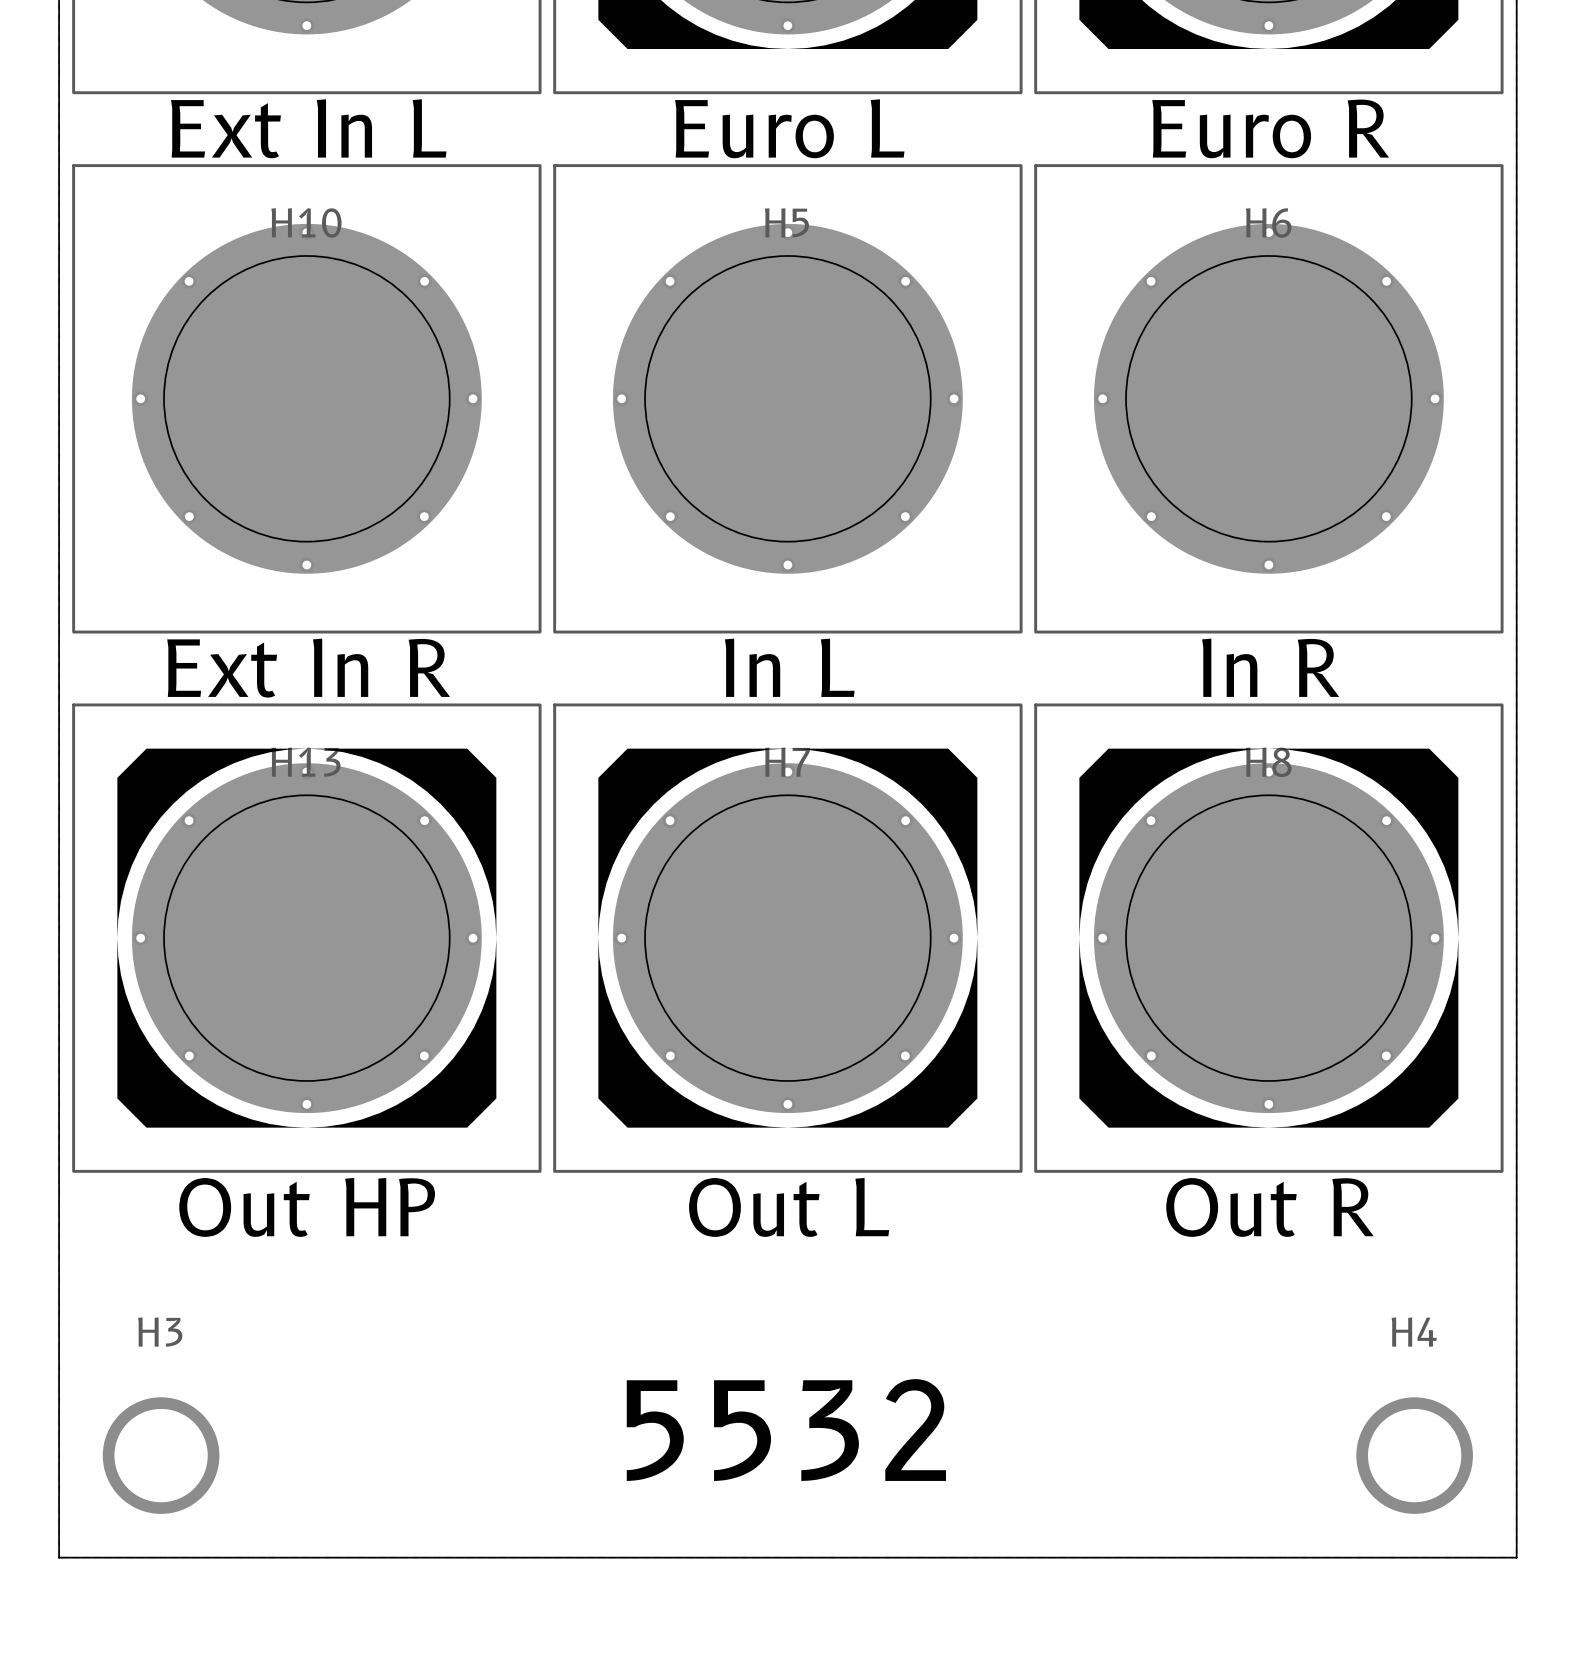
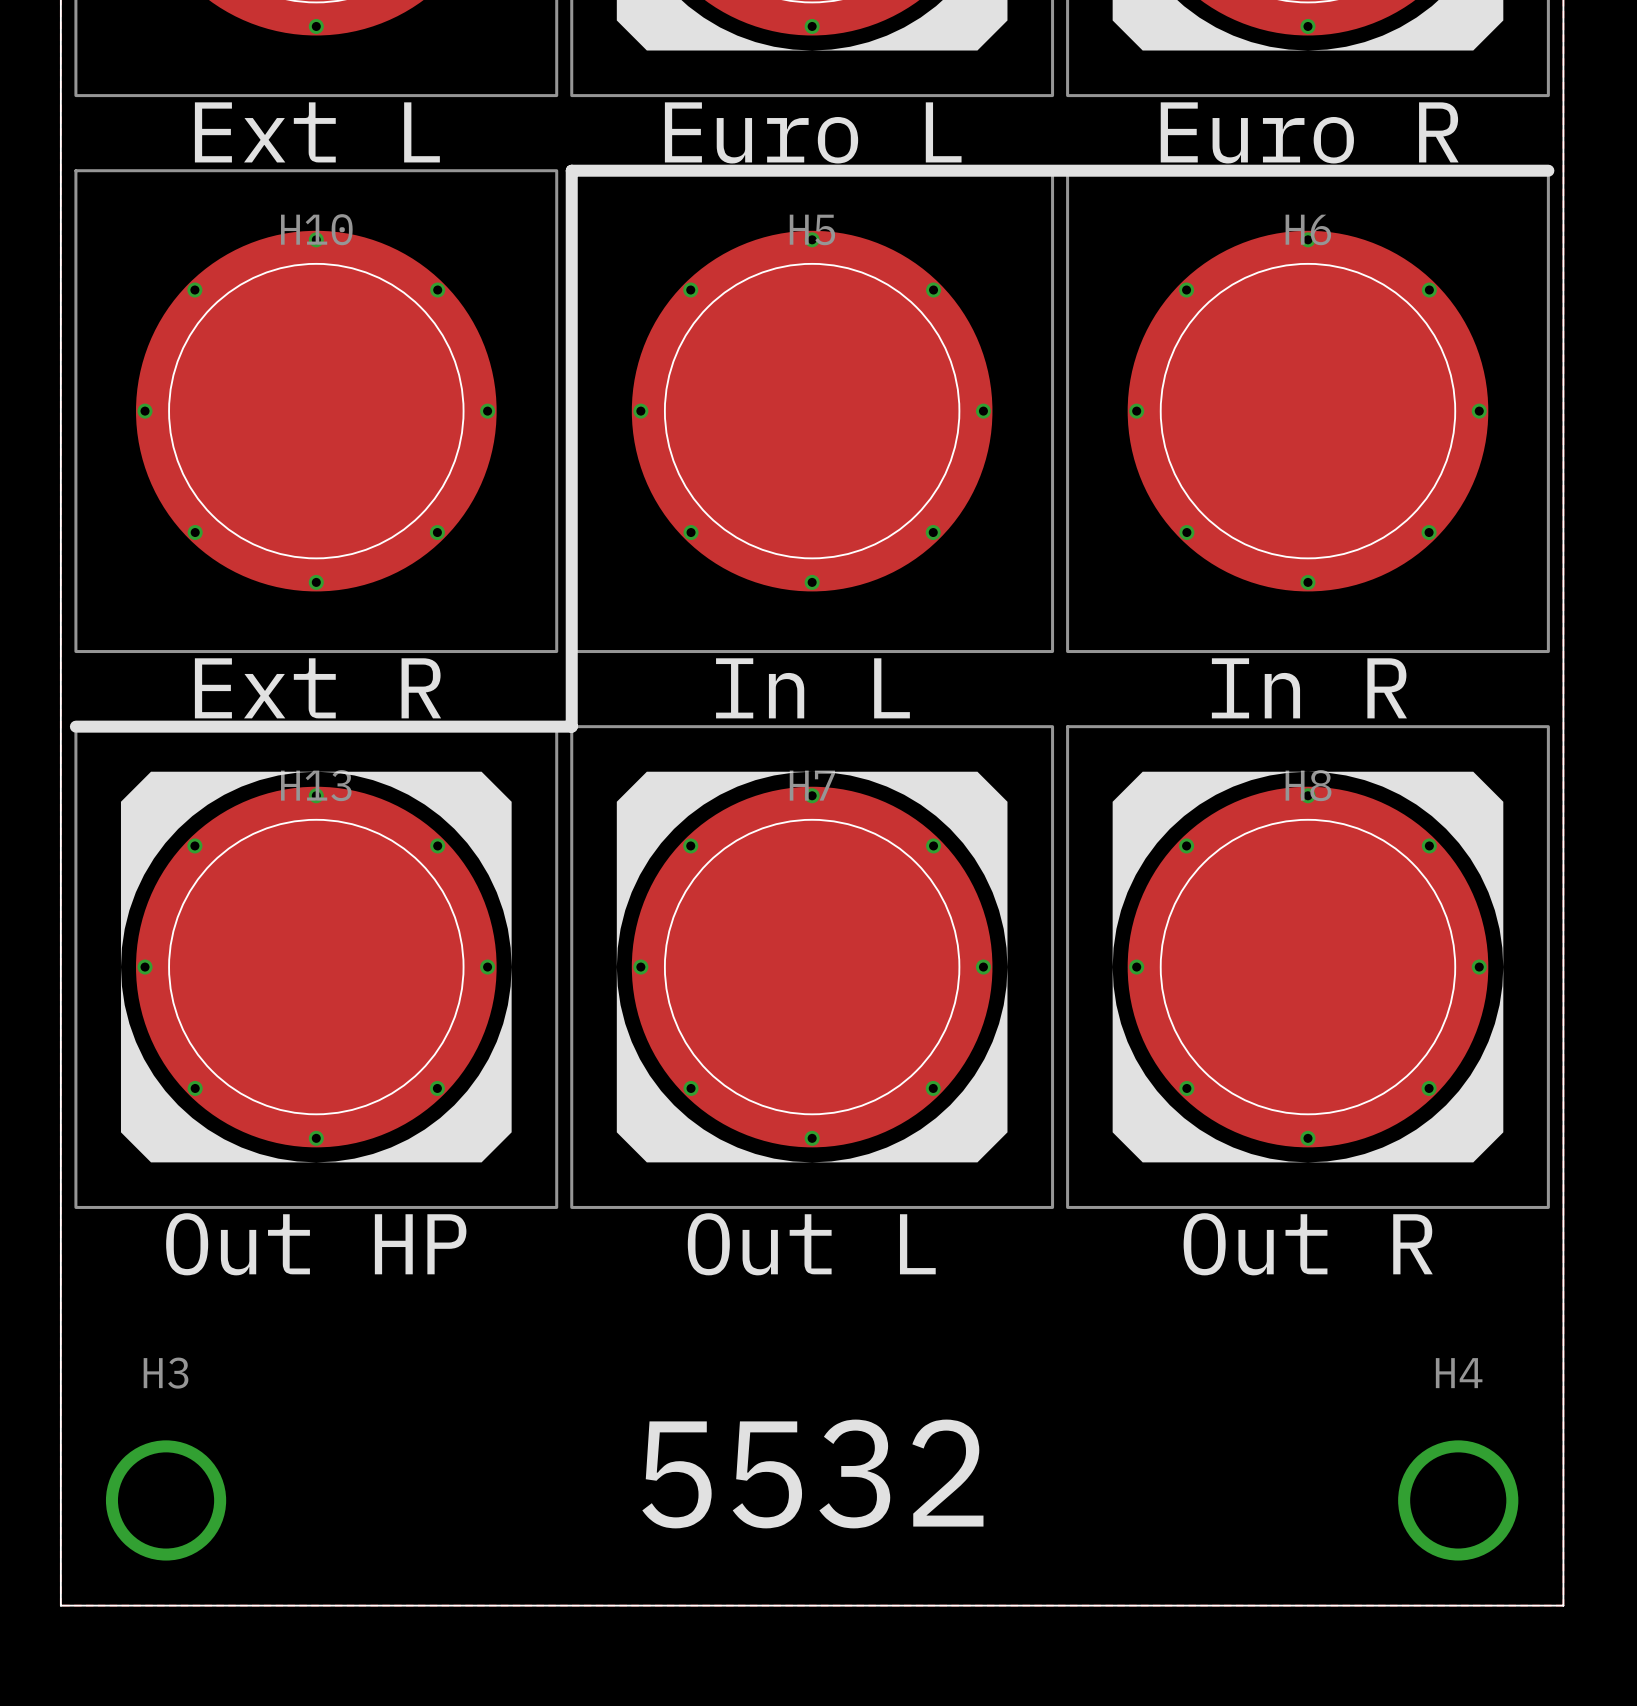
part value: Ext In L (308, 128) -> Ext L (317, 132)
line: none -> (1548, 170) (571, 170) (571, 726) (75, 726)
H10 value: Ext In R (308, 668) -> Ext R (317, 688)

